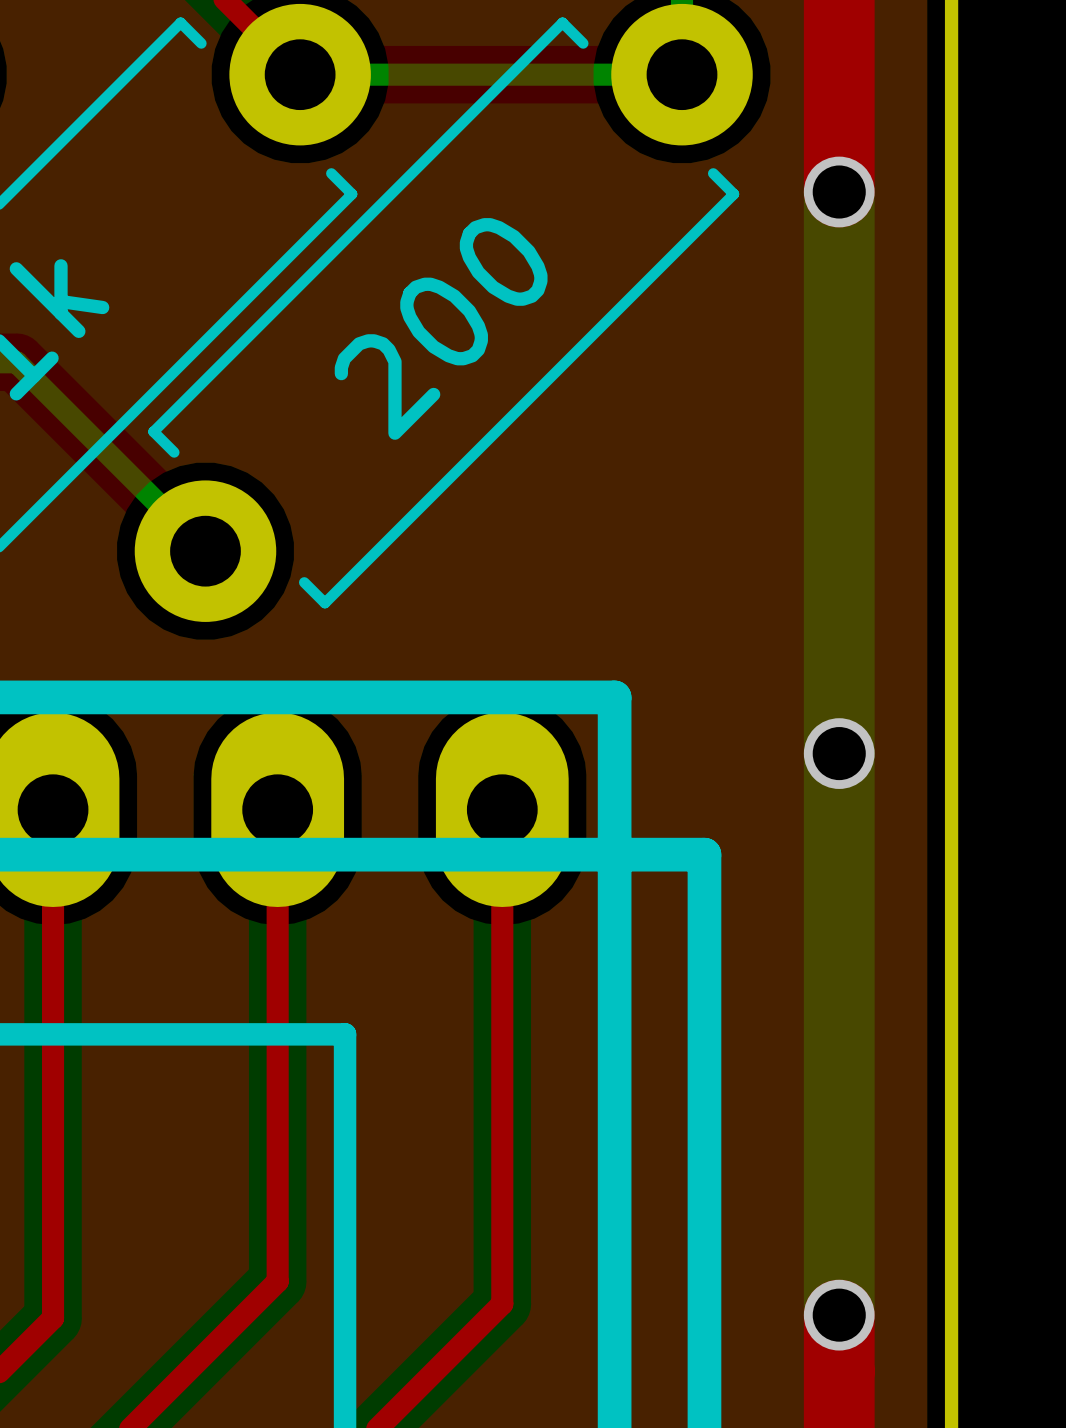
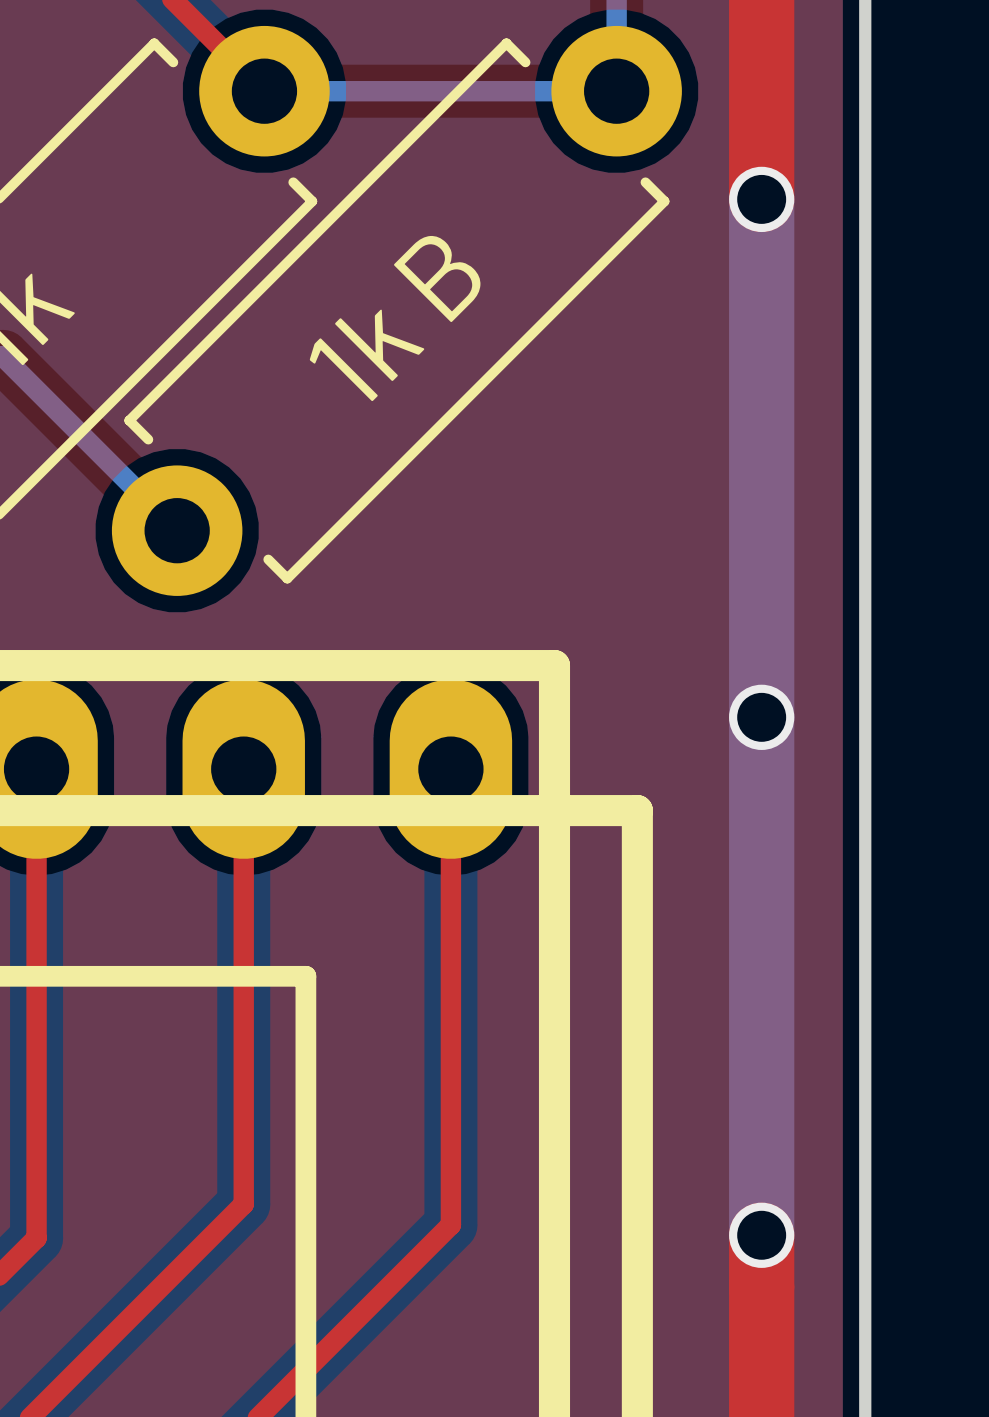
part value: 200 (441, 328) -> 1k B (395, 318)

